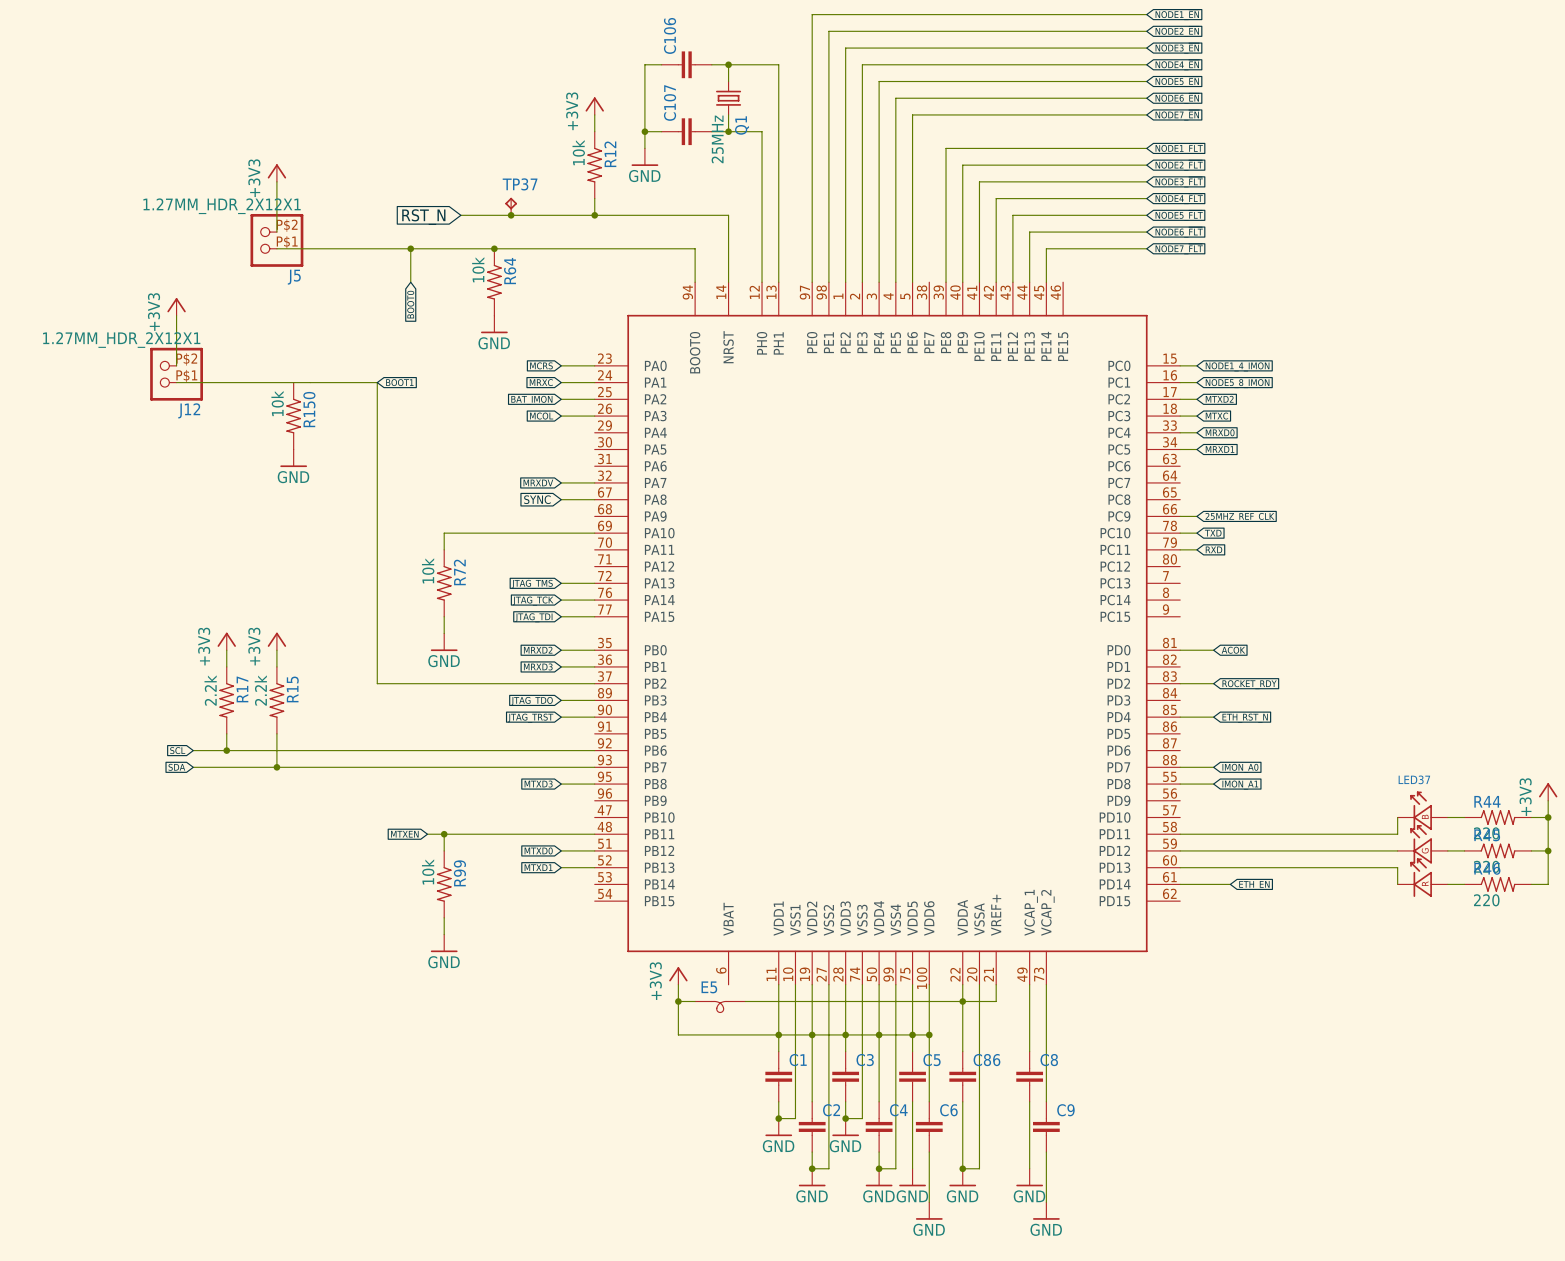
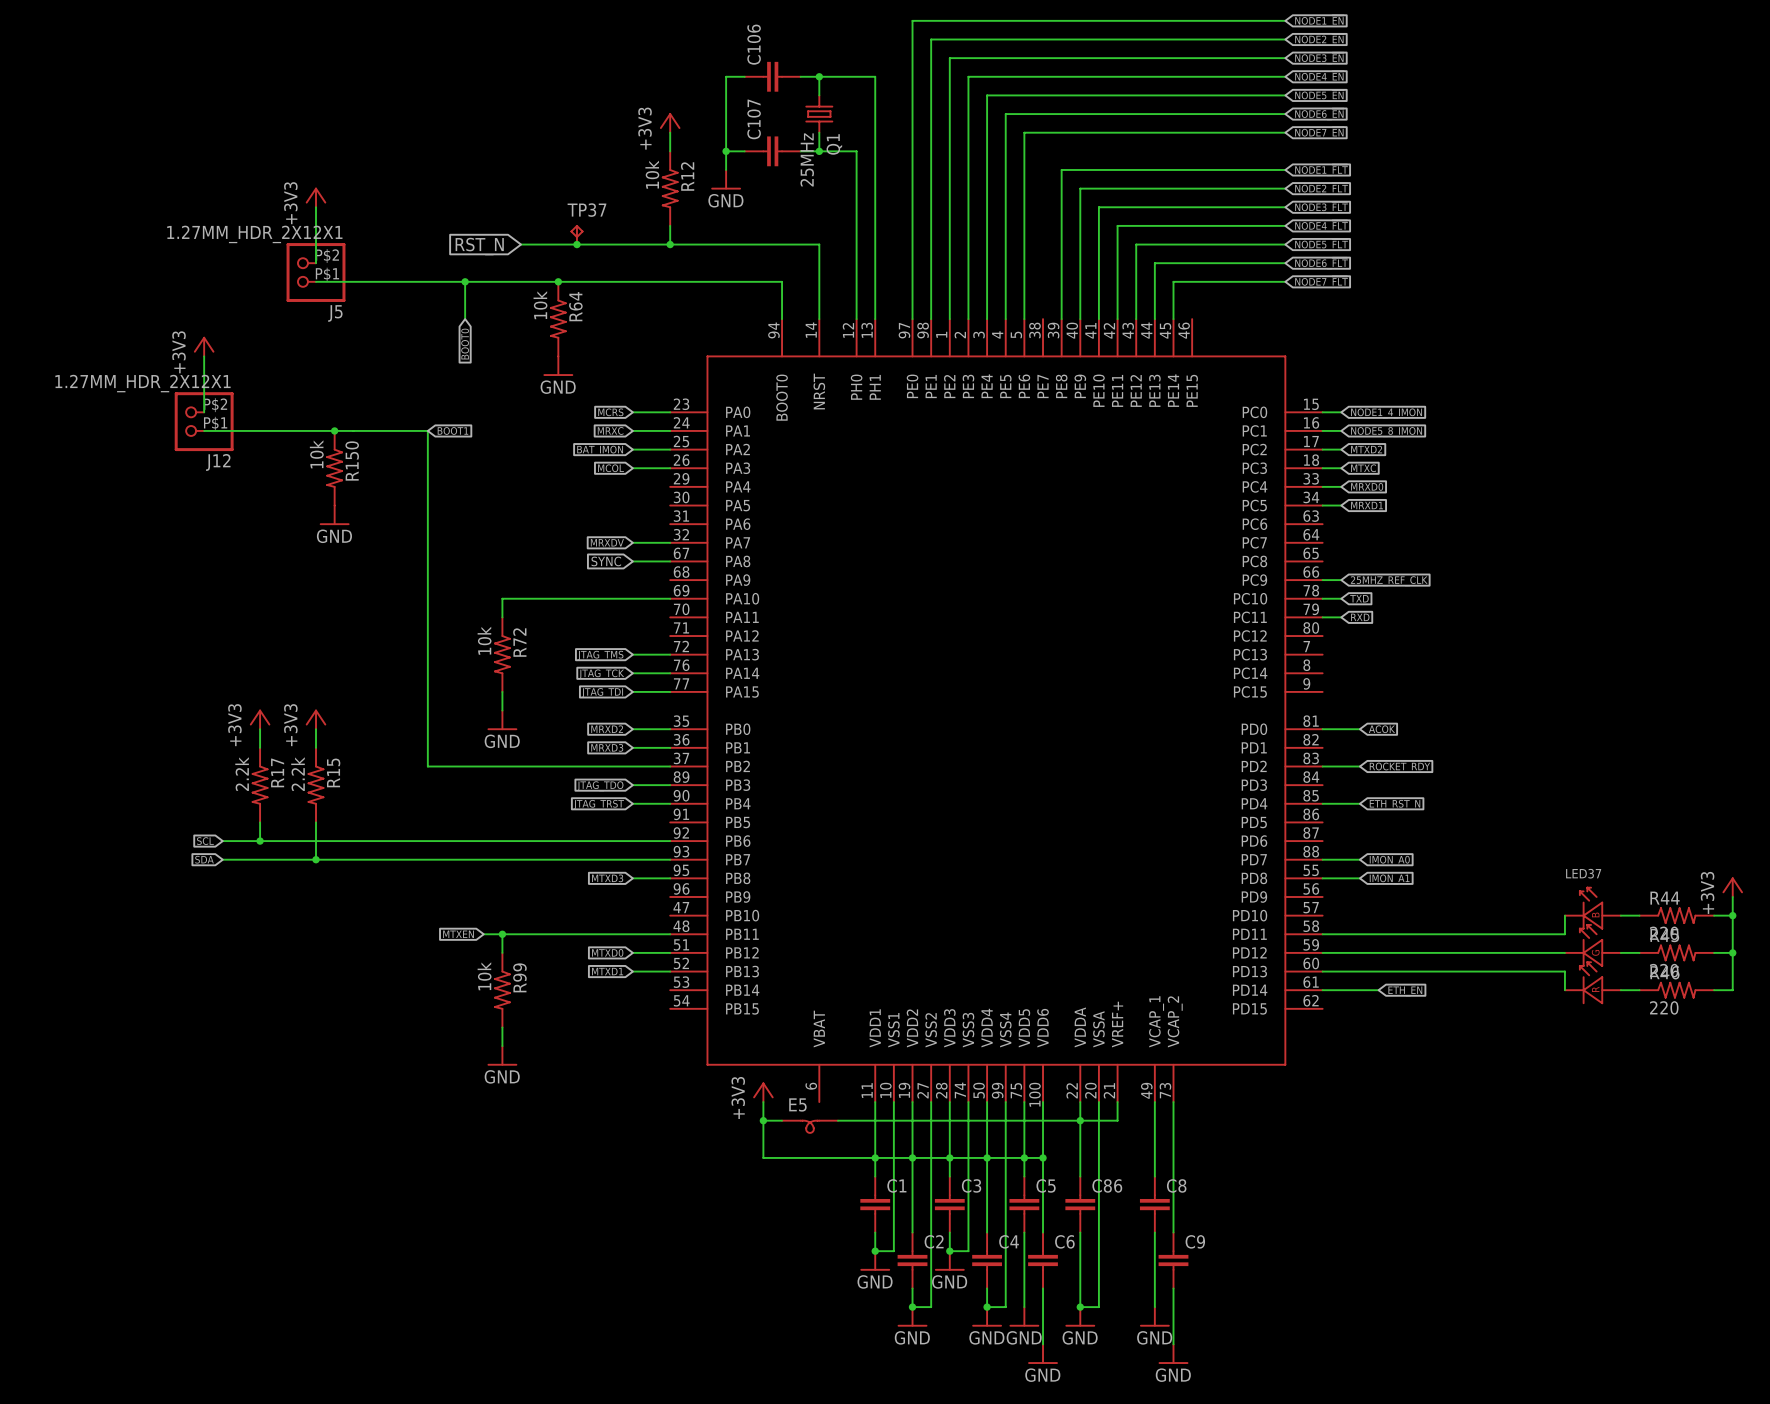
junction: none -> (334, 430)

